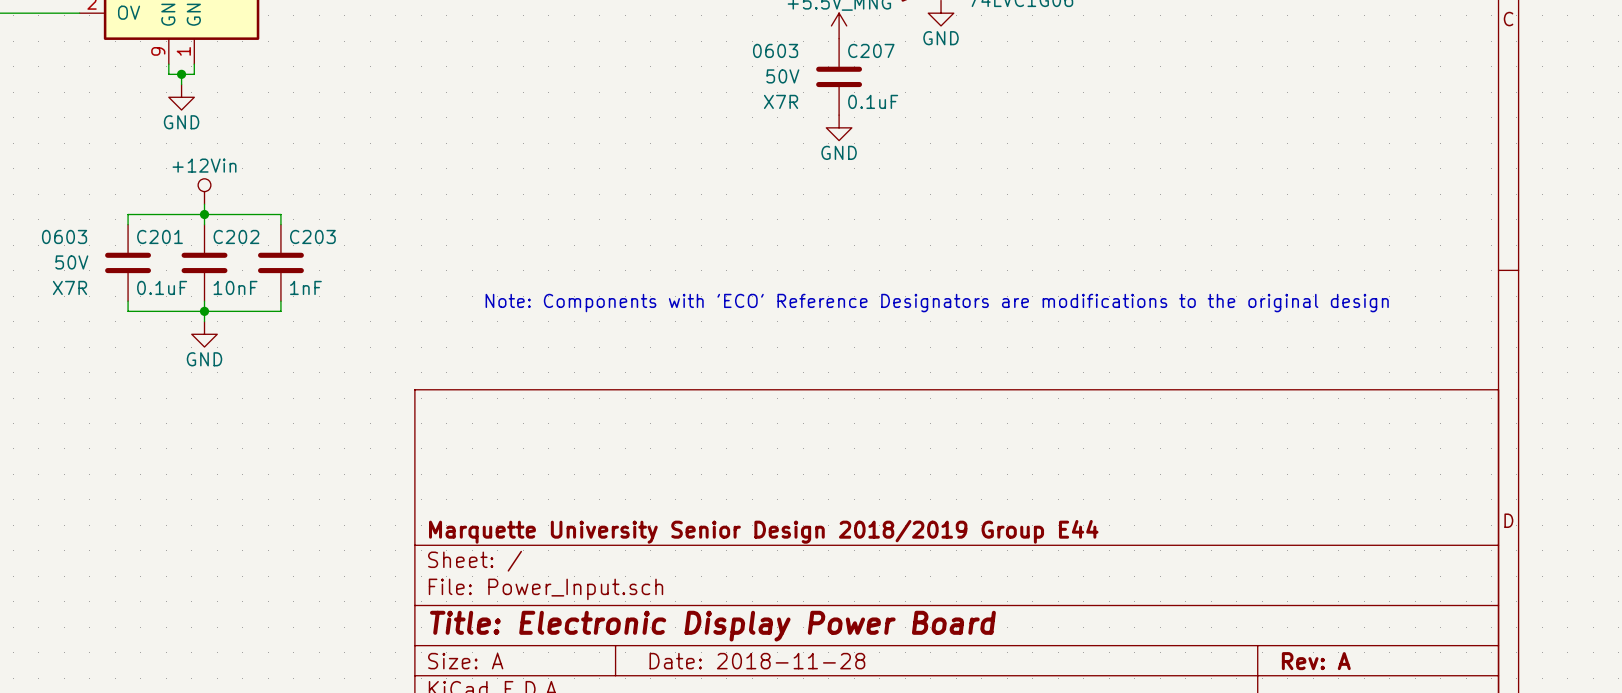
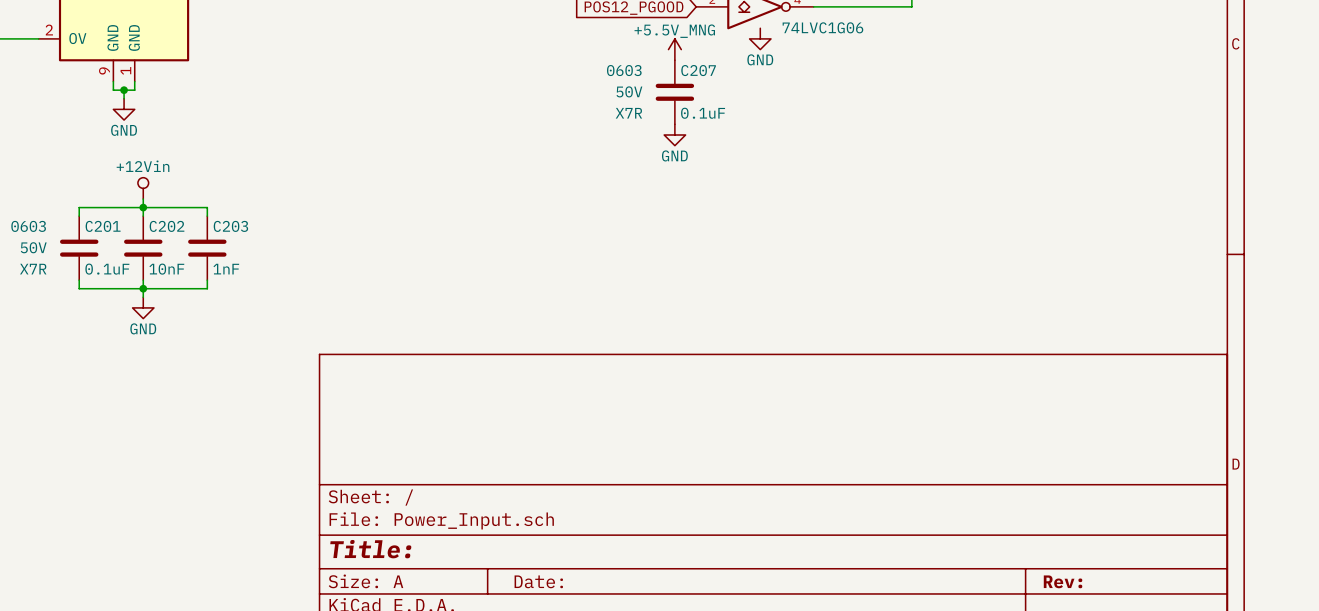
text: Note: Components with 'ECO' Reference Designators are modifications to the original design (937, 303) -> none
title block: Marquette University Senior Design 2018/2019 Group E44 (763, 531) -> none
title block: Title: Electronic Display Power Board (712, 626) -> Title: (370, 549)
title block: Date: 2018-11-28 (757, 661) -> Date: (538, 581)
title block: Rev: A (1316, 661) -> Rev: (1063, 581)

